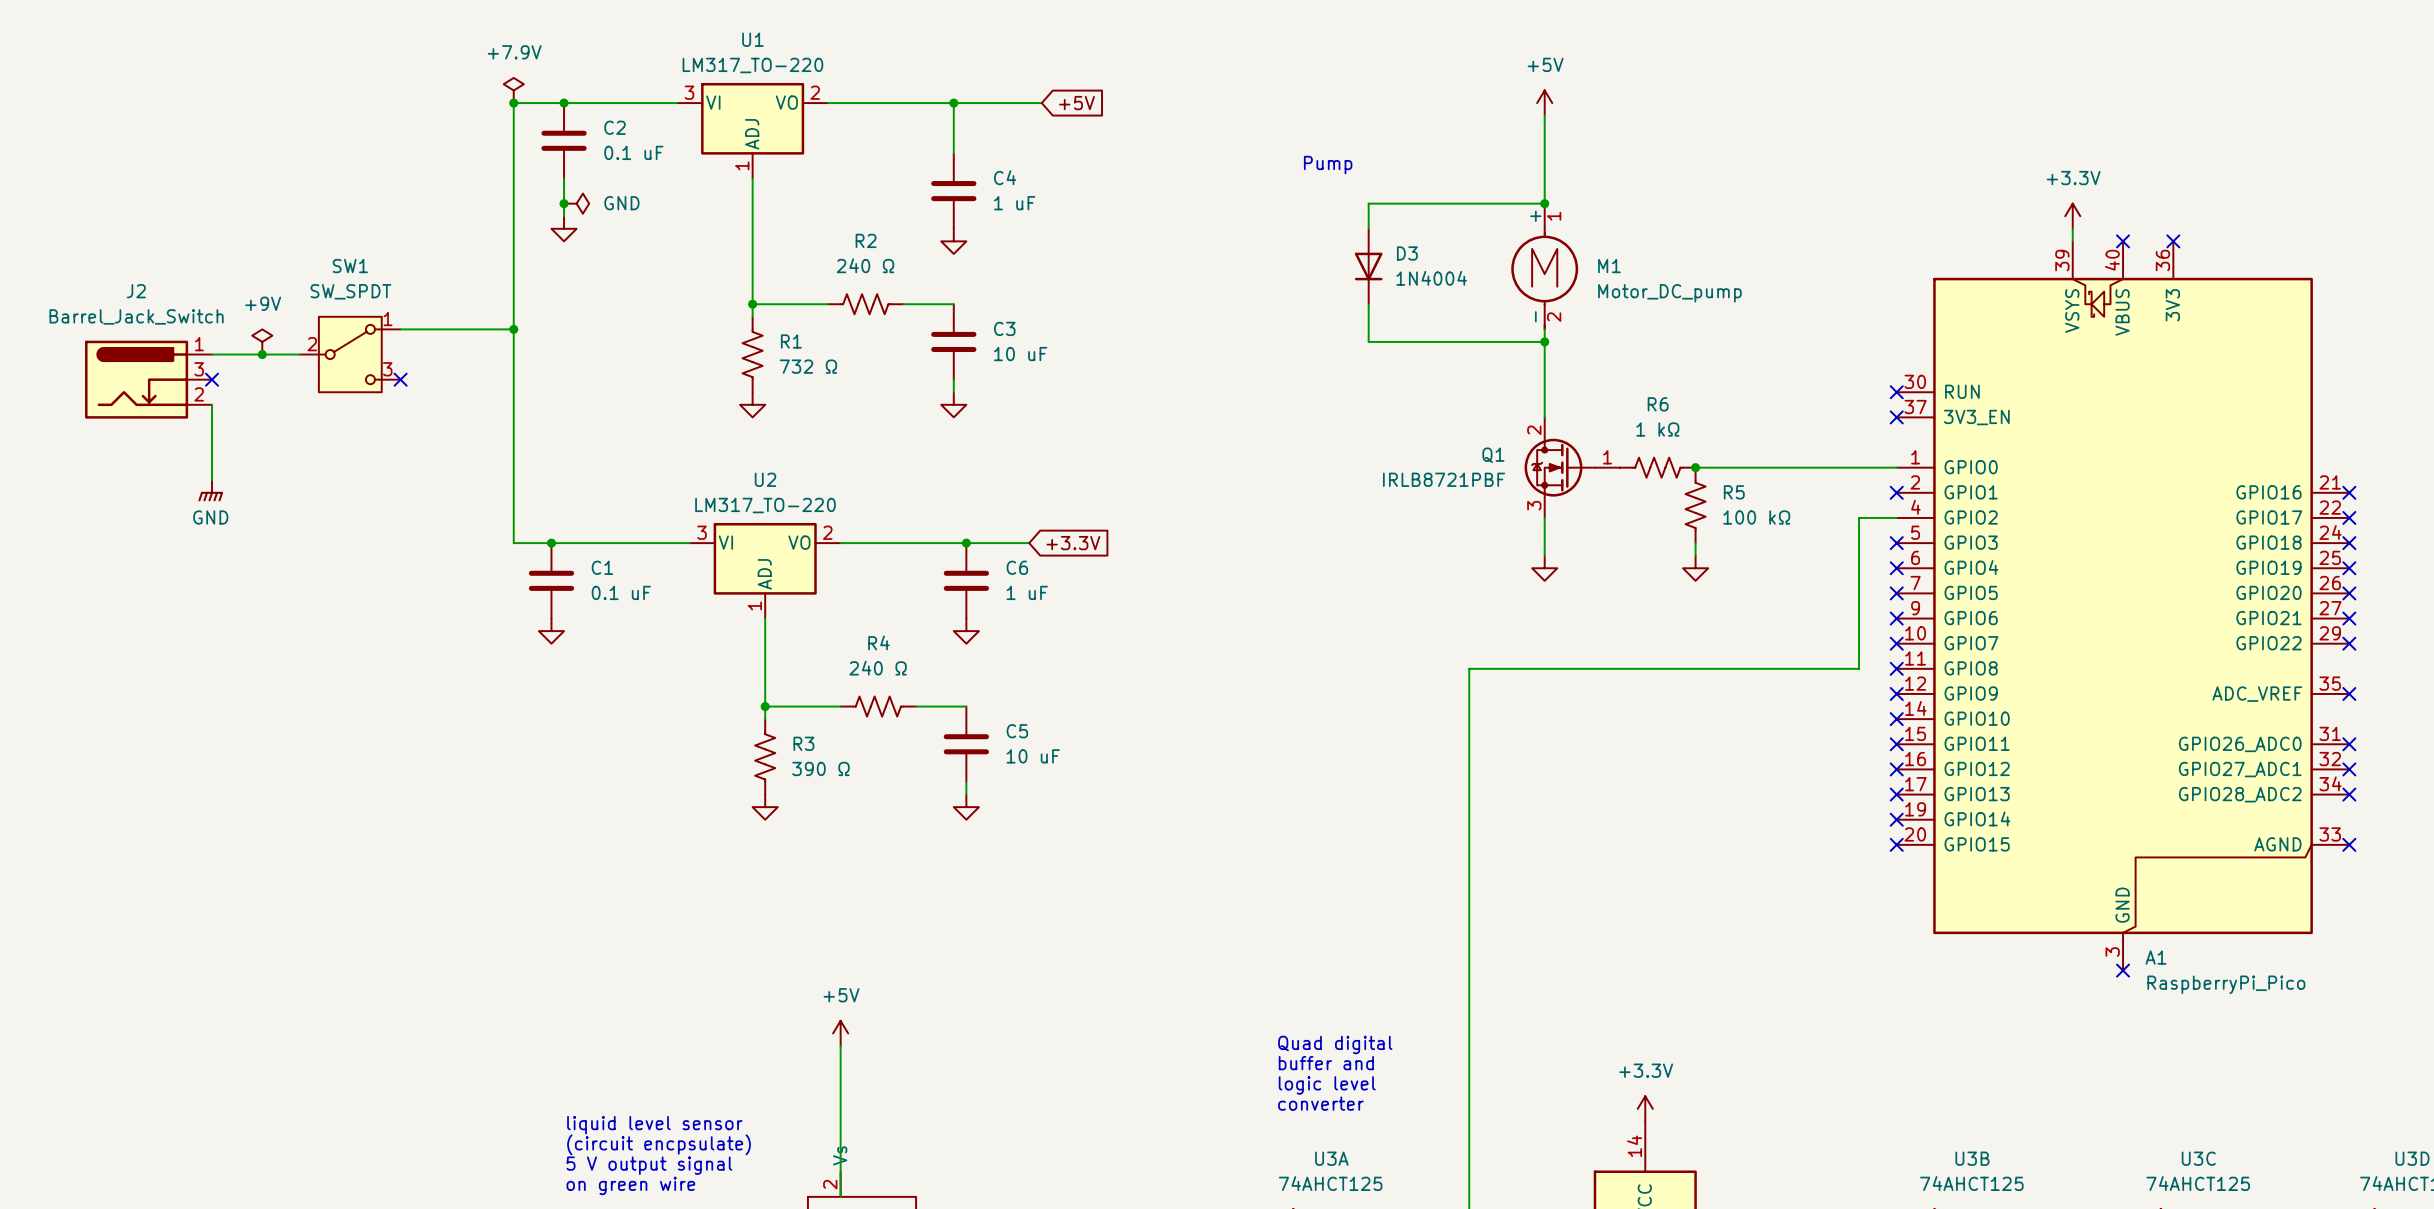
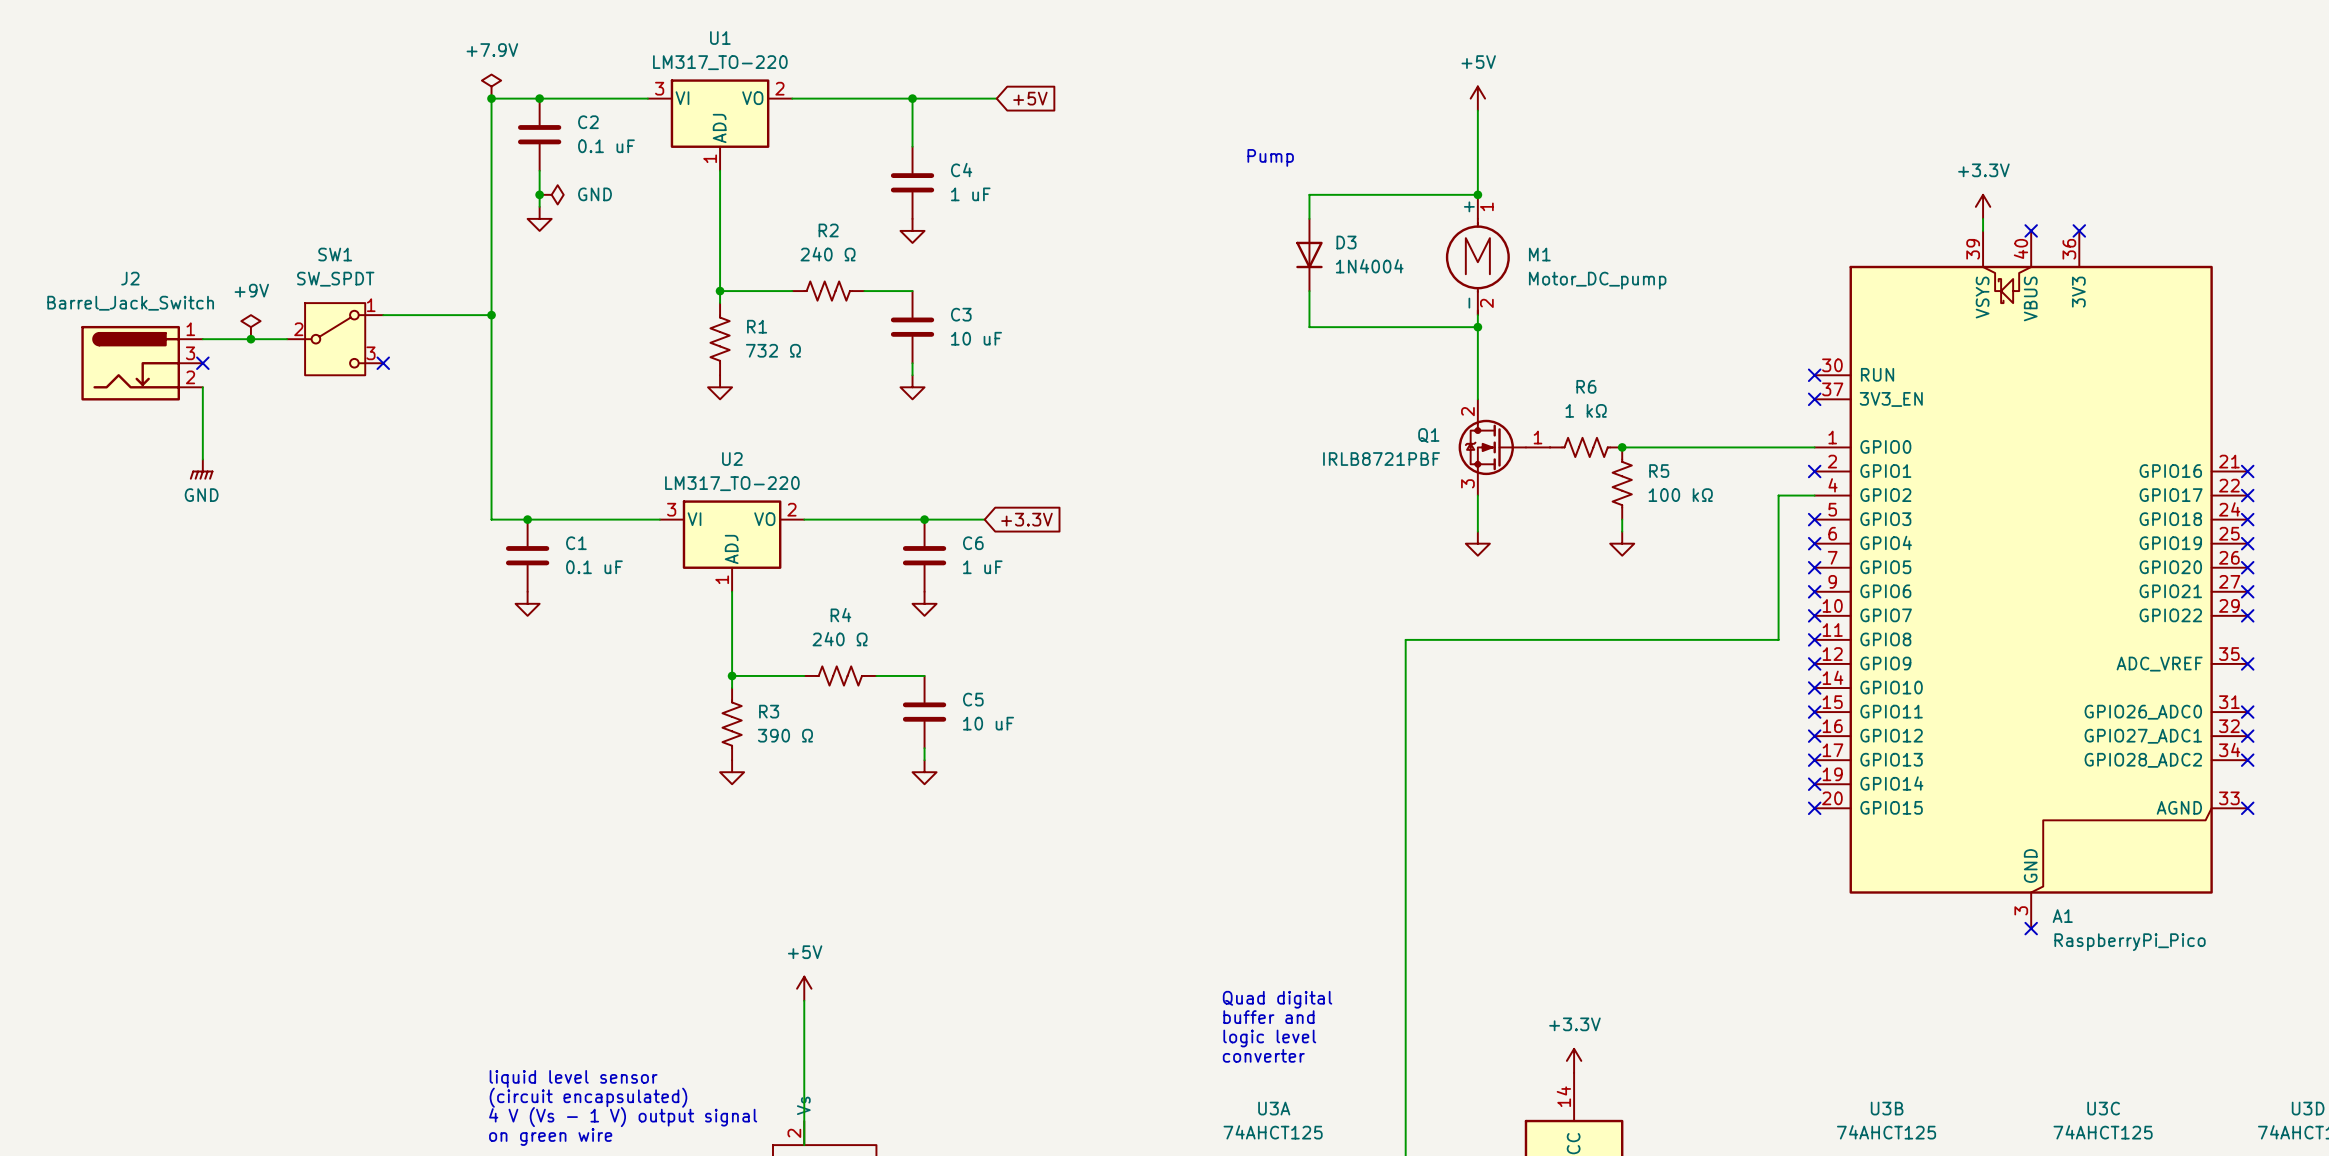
text position: liquid level sensor (654, 1125) -> liquid level sensor (573, 1078)
text: (circuit encpsulate) (659, 1144) -> (circuit encapsulated) (588, 1097)
text: 5 V output signal (649, 1165) -> 4 V (Vs - 1 V) output signal (623, 1117)
text position: on green wire (630, 1185) -> on green wire (550, 1137)

